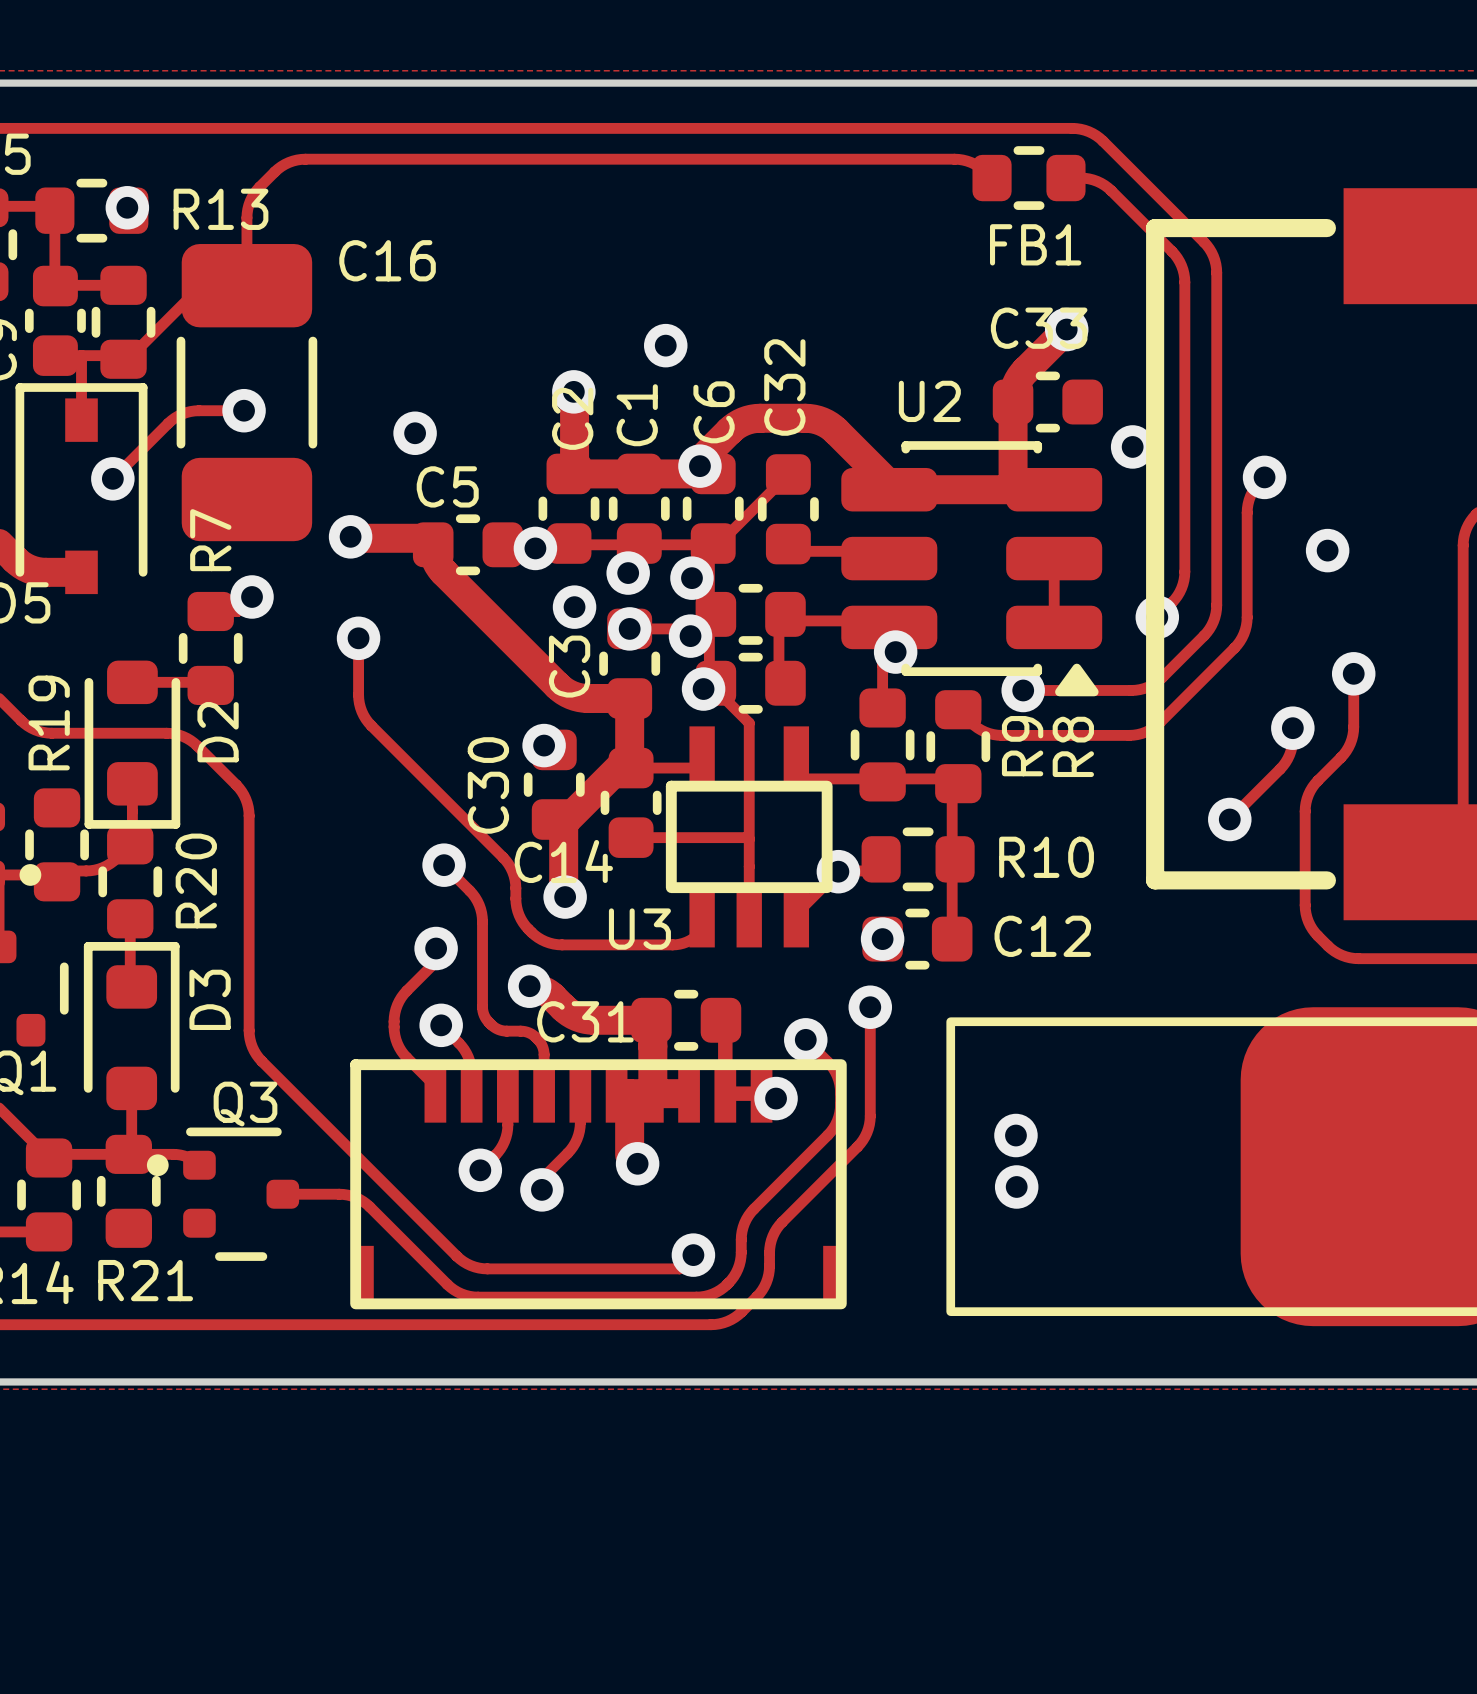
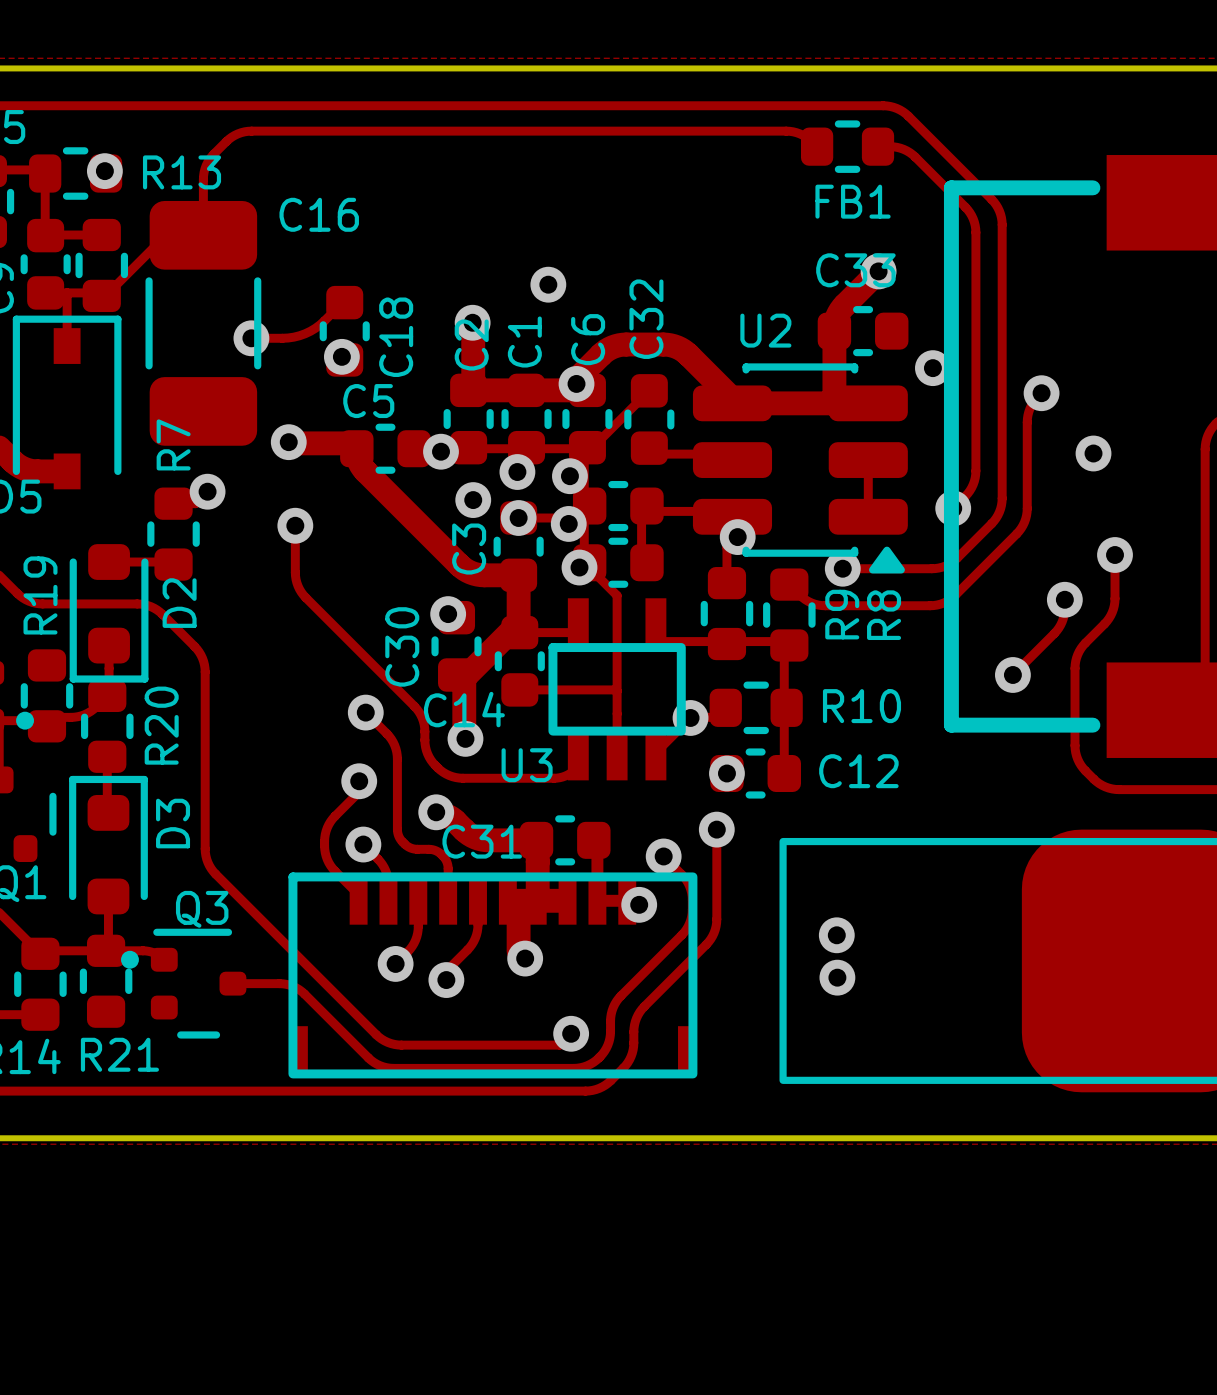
track: none -> (335, 310) (315, 328) (299, 335) (288, 338) (251, 338)
C18: none -> (344, 331)
track: (244, 410) (194, 410) (178, 415) (168, 423) (112, 478) -> none
via position: (244, 410) -> (251, 338)
via: (112, 478) -> none

